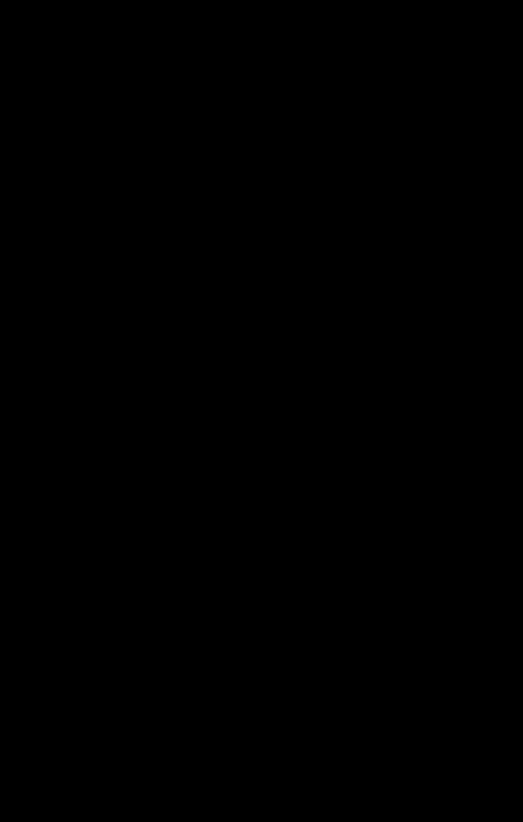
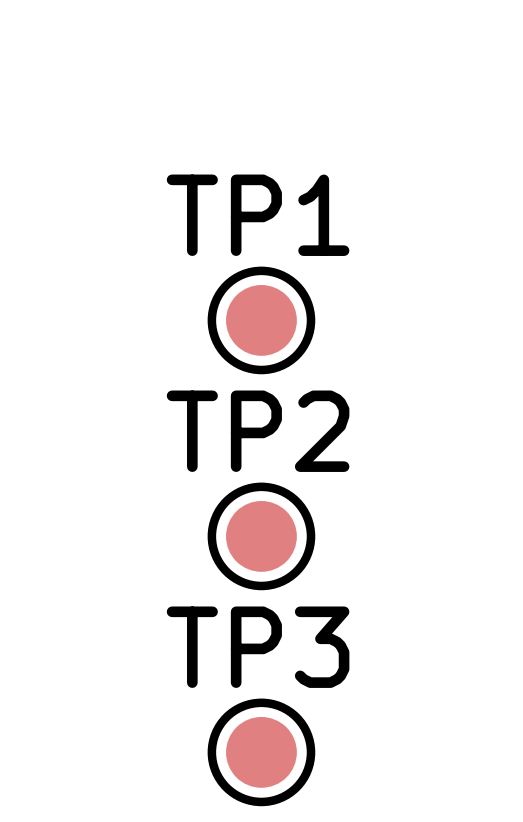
TP1: none -> (261, 320)
TP2: none -> (261, 536)
TP3: none -> (261, 752)

